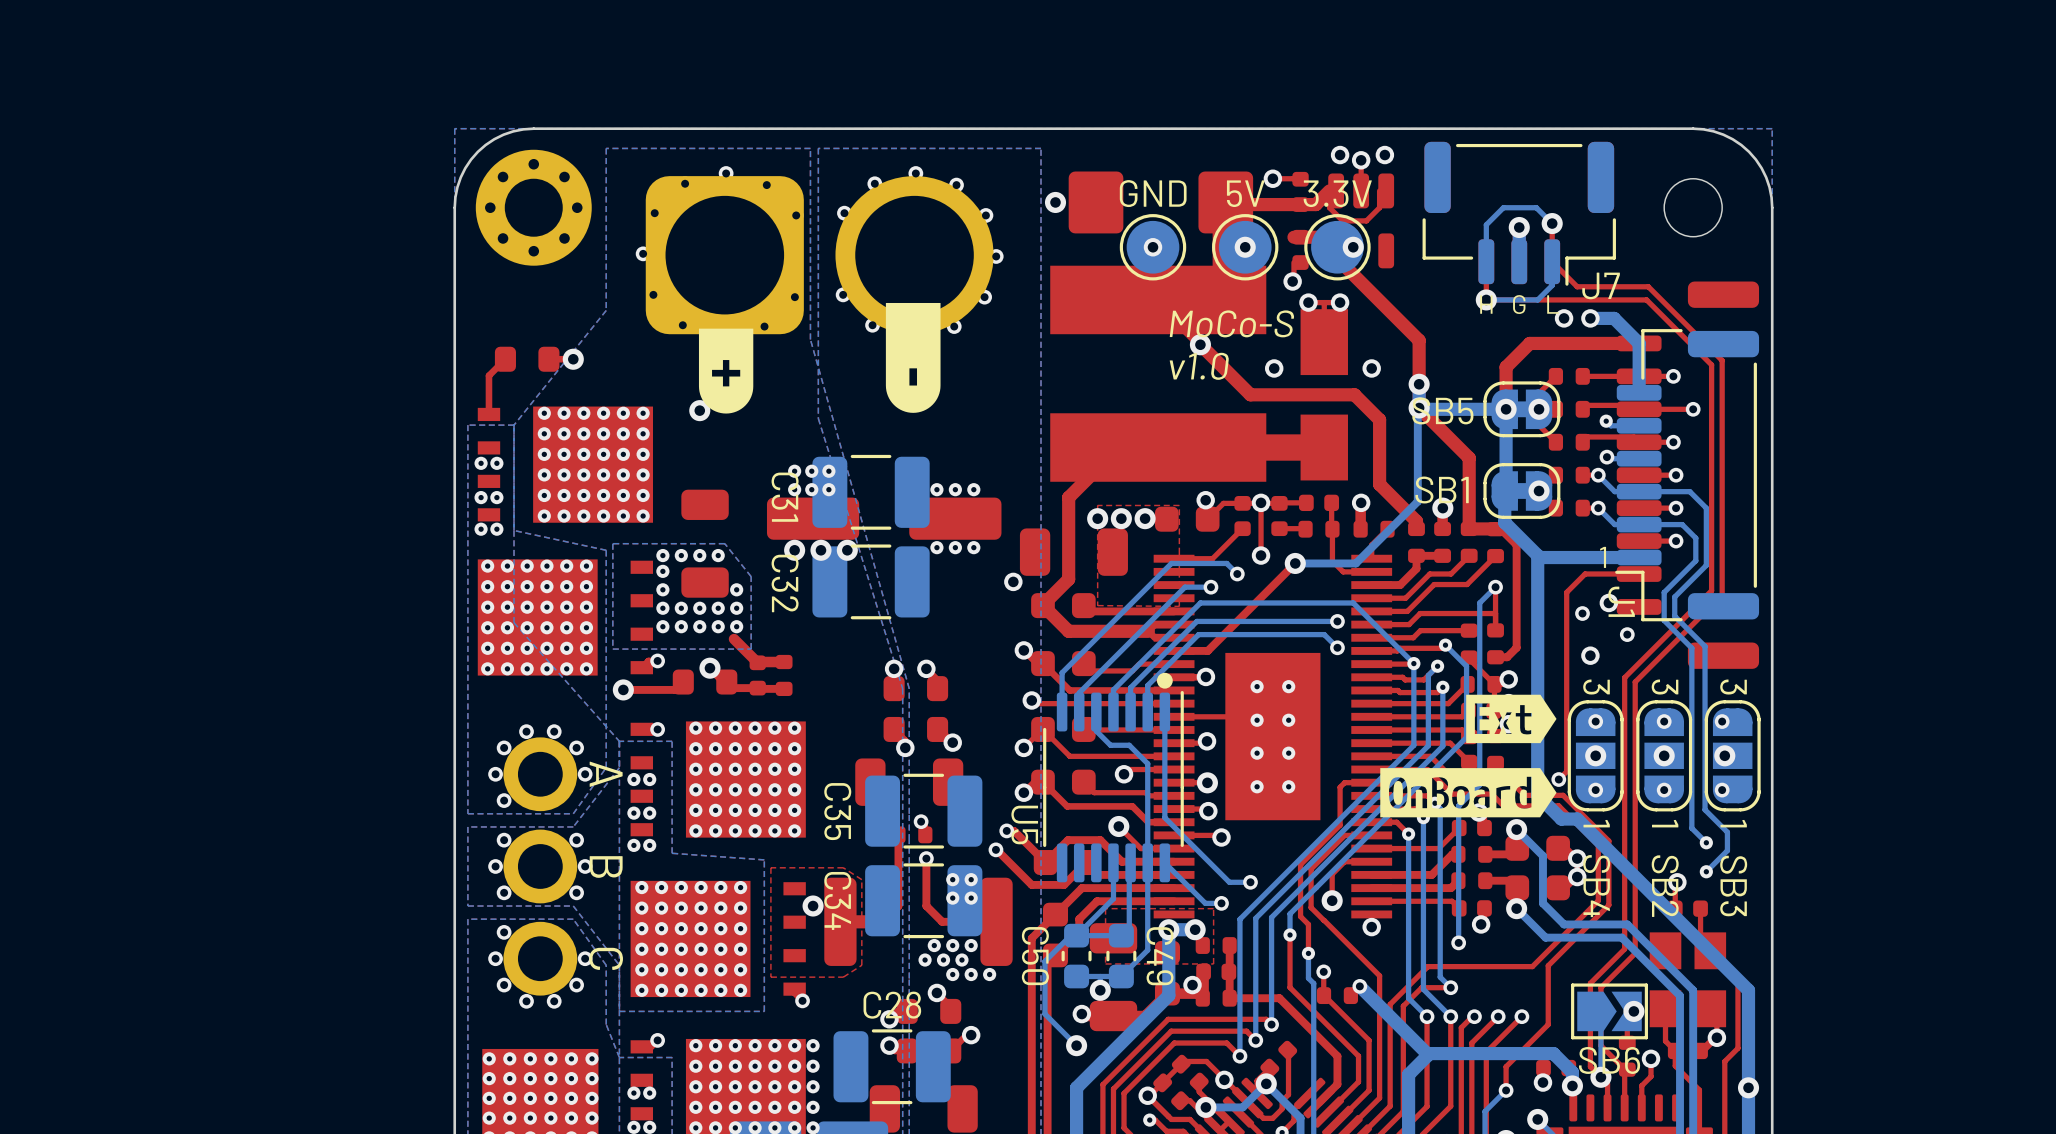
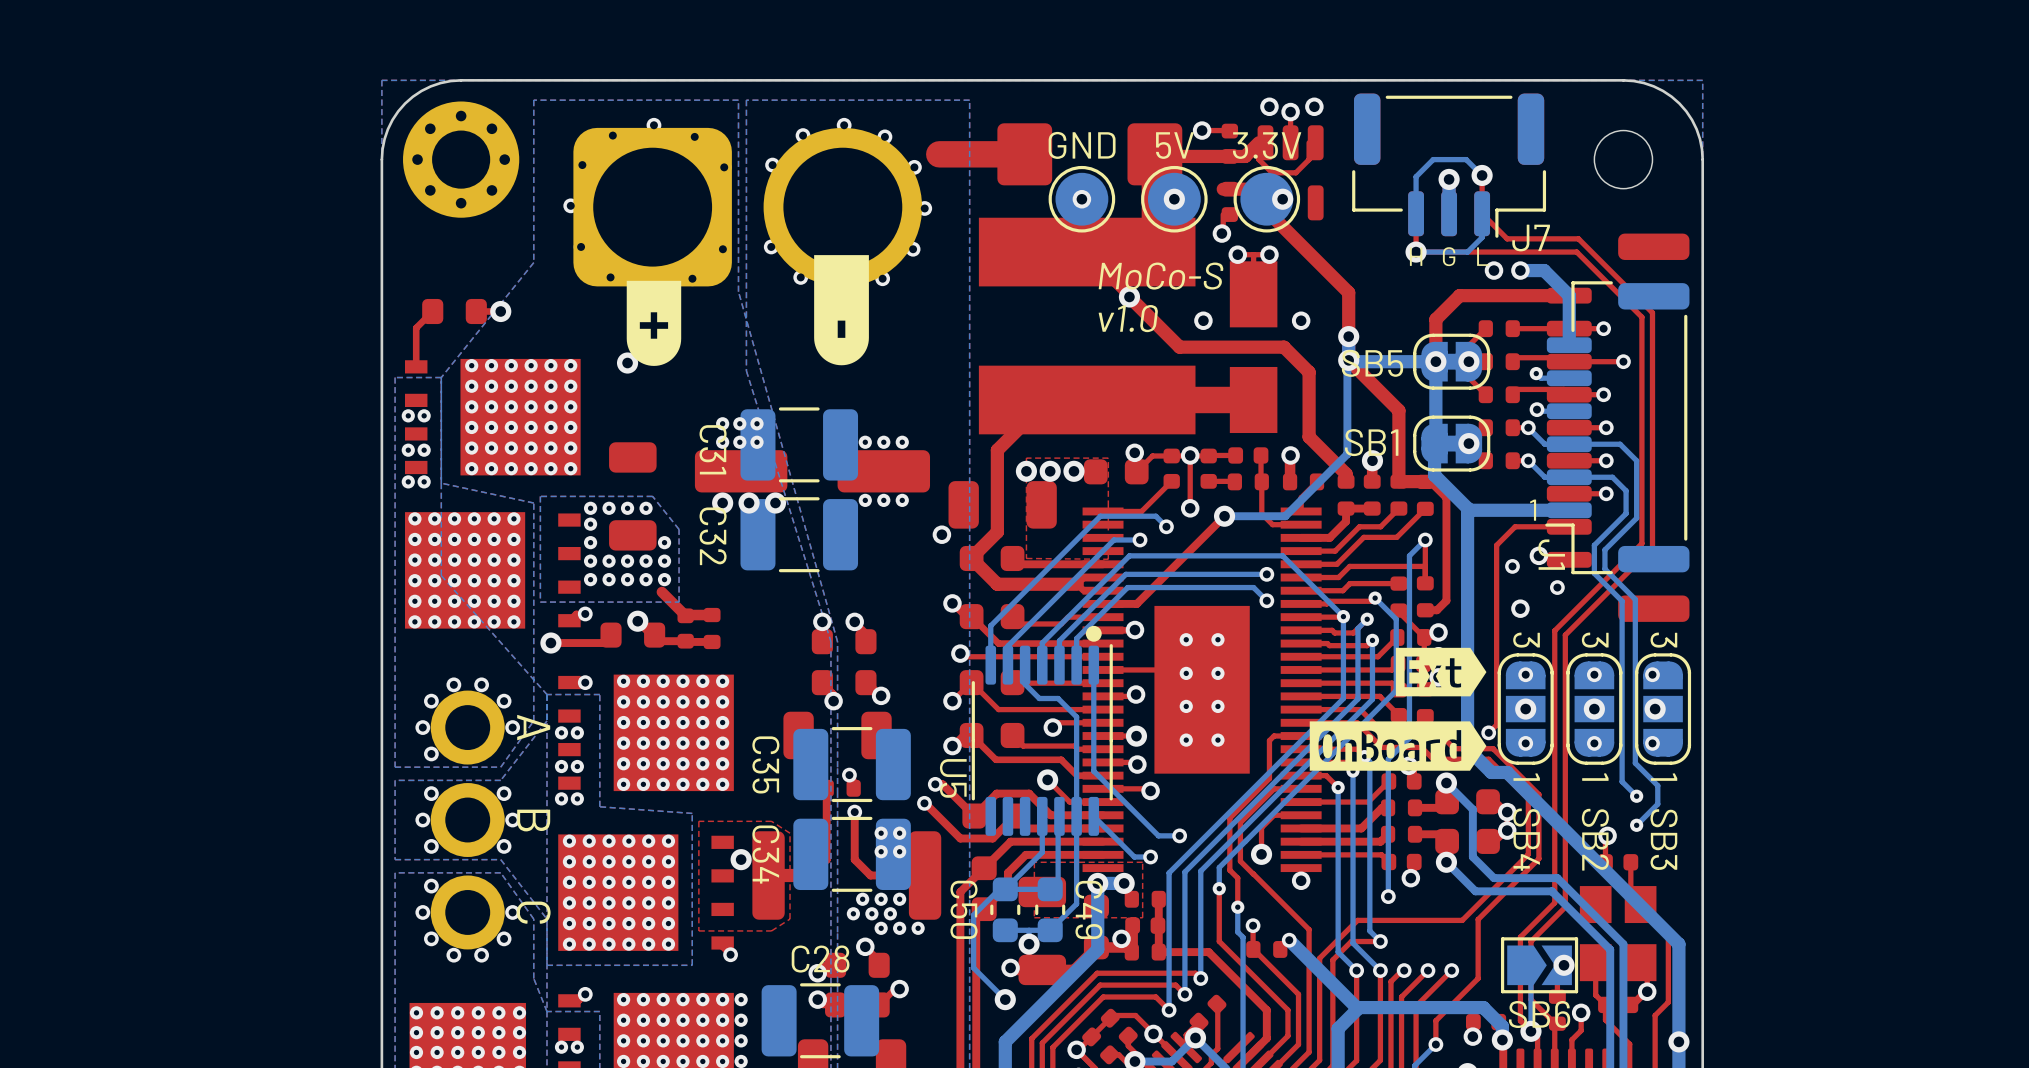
via: (1055, 202) -> none
top track: none -> (1024, 154) (939, 154)

